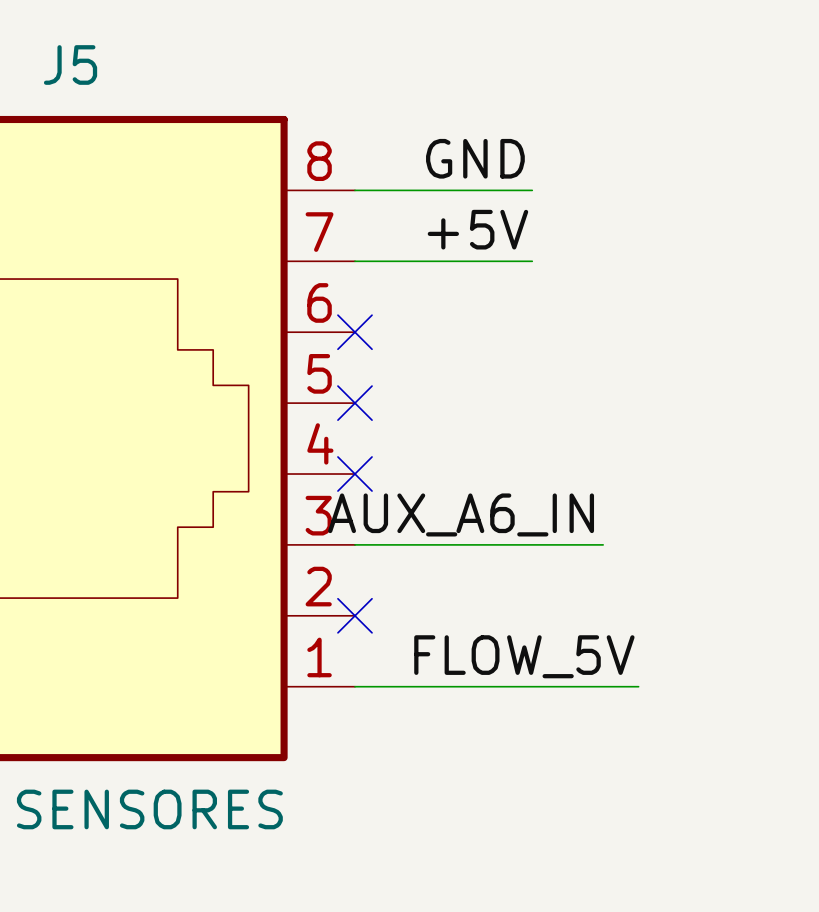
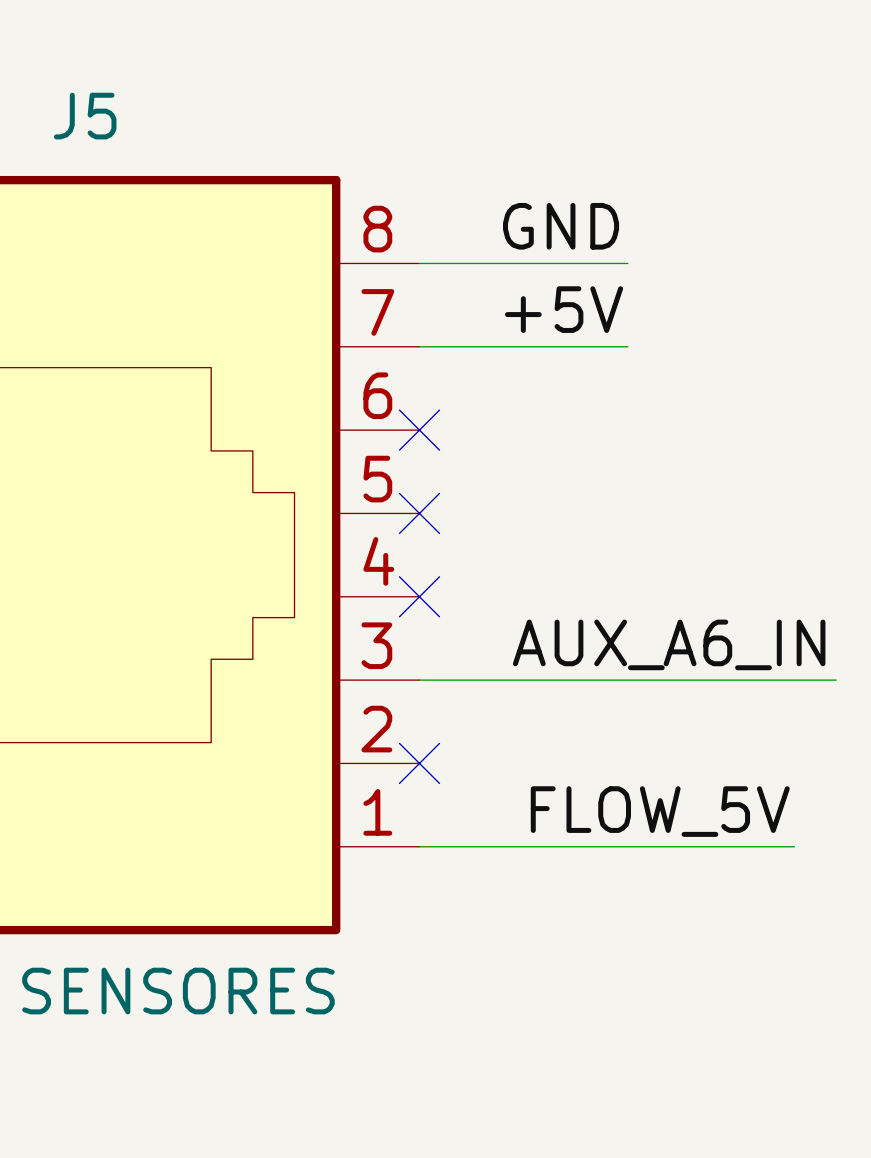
label position: AUX_A6_IN (461, 514) -> AUX_A6_IN (669, 644)
wire: none -> (711, 680) (836, 680)
label position: FLOW_5V (524, 656) -> FLOW_5V (660, 811)
wire: none -> (752, 846) (794, 846)

